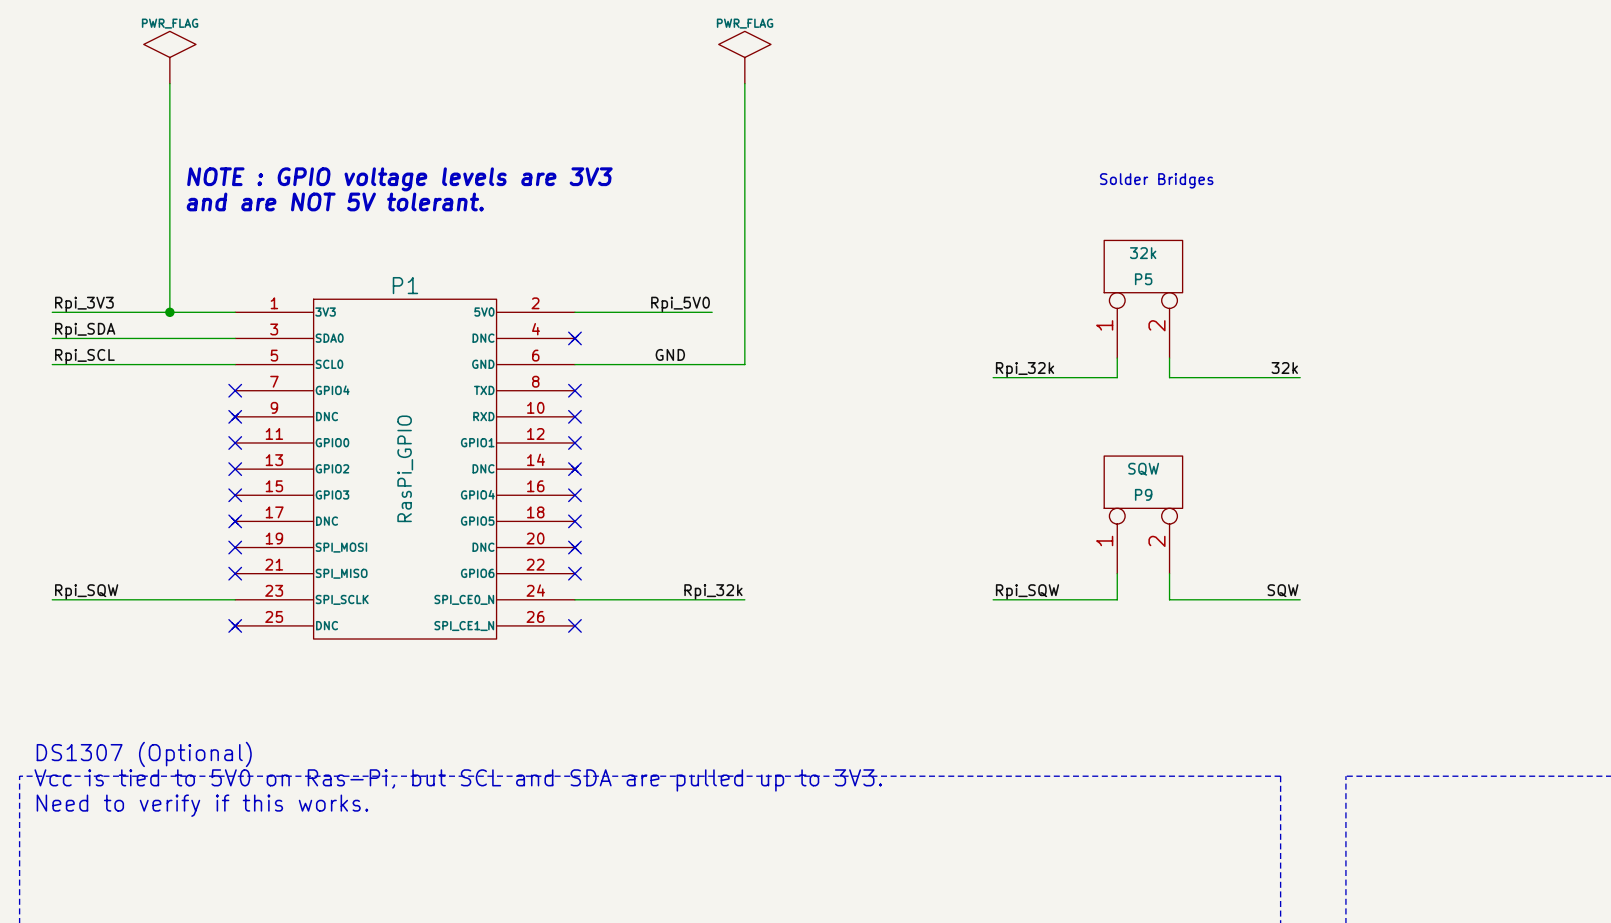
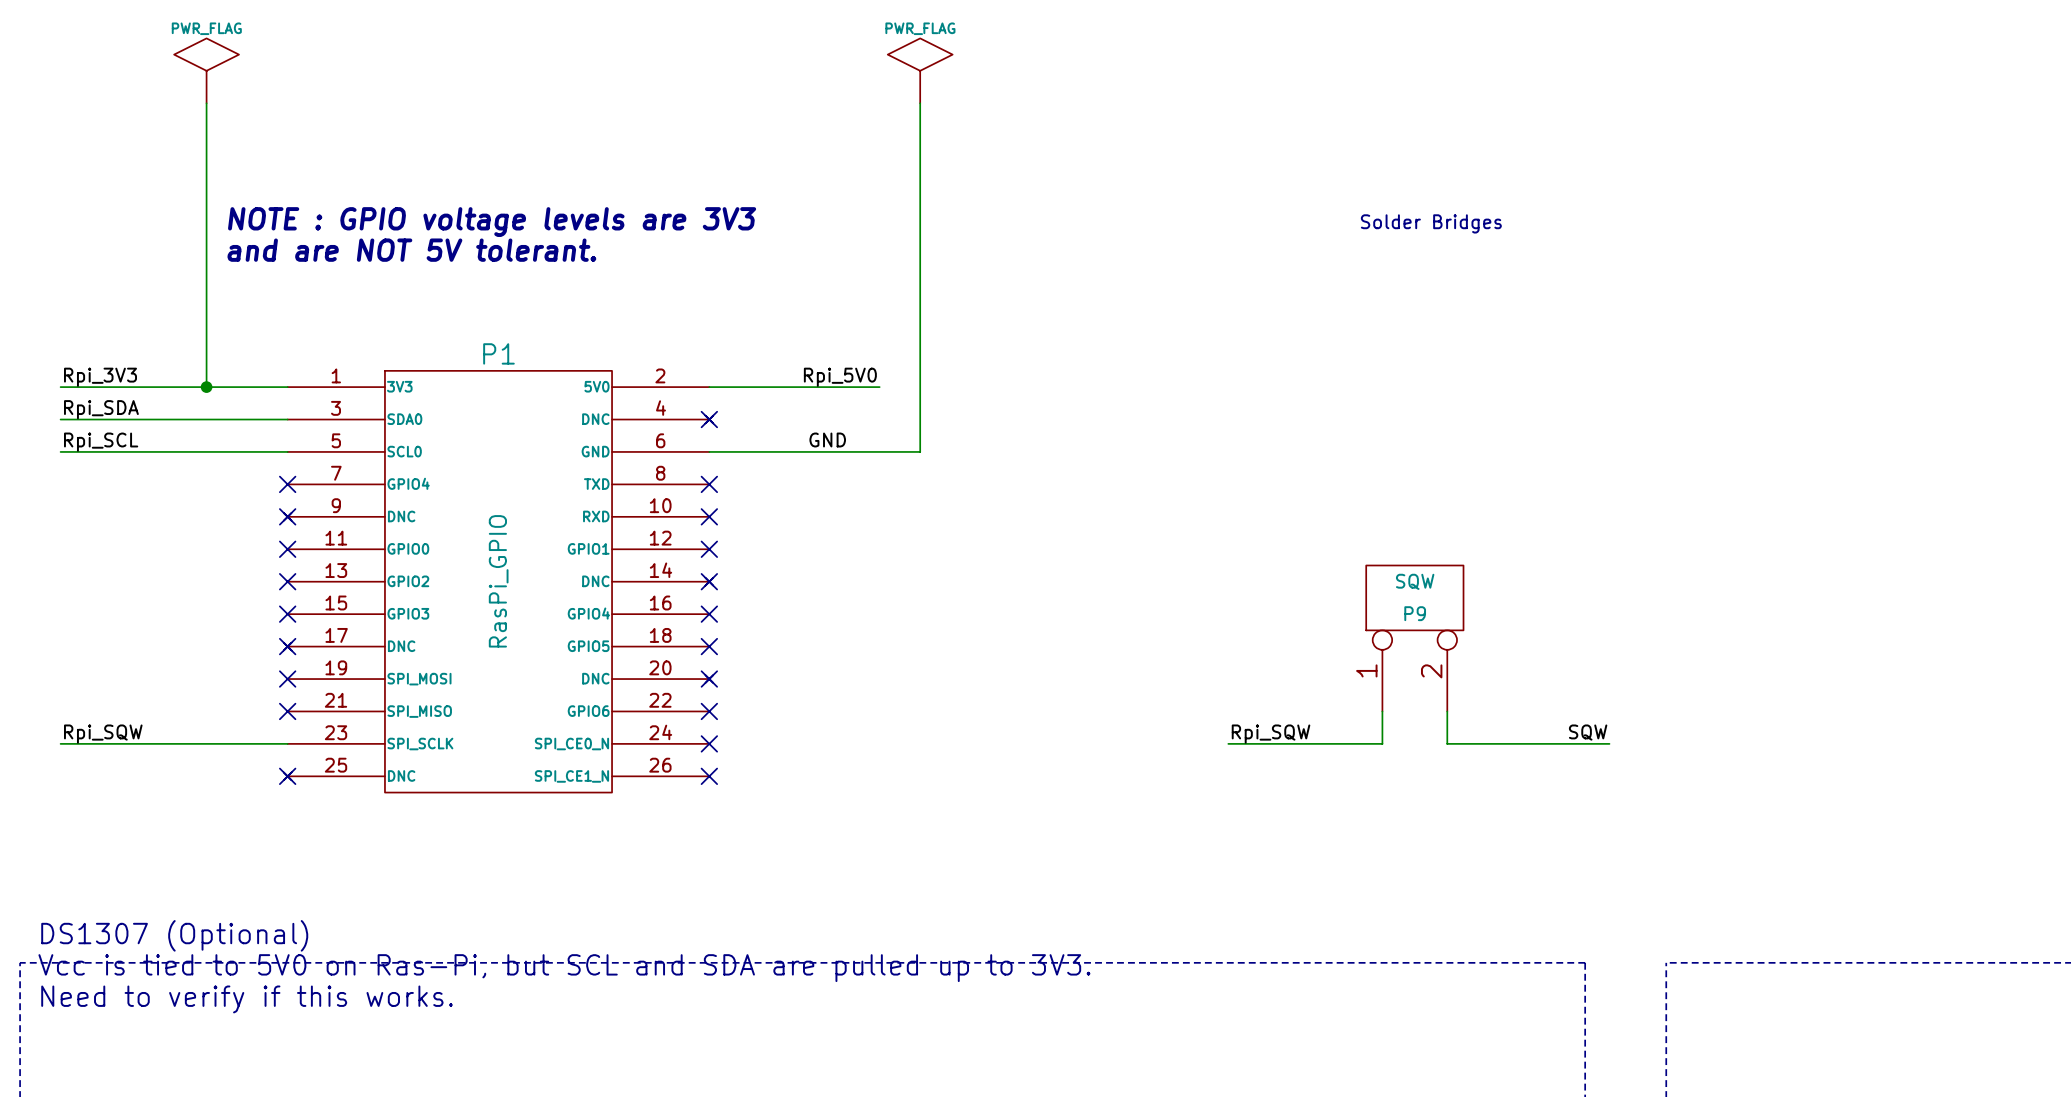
P5: 32k (1143, 299) -> none
wire: (1117, 358) (1117, 377) (993, 377) -> none
wire: (1169, 358) (1169, 377) (1300, 377) -> none
label: 32k (1284, 368) -> none
label: Rpi_32k (1025, 369) -> none
label: Rpi_32k (713, 591) -> none
wire: (574, 599) (744, 599) -> none
no-connect mark: none -> (709, 743)

